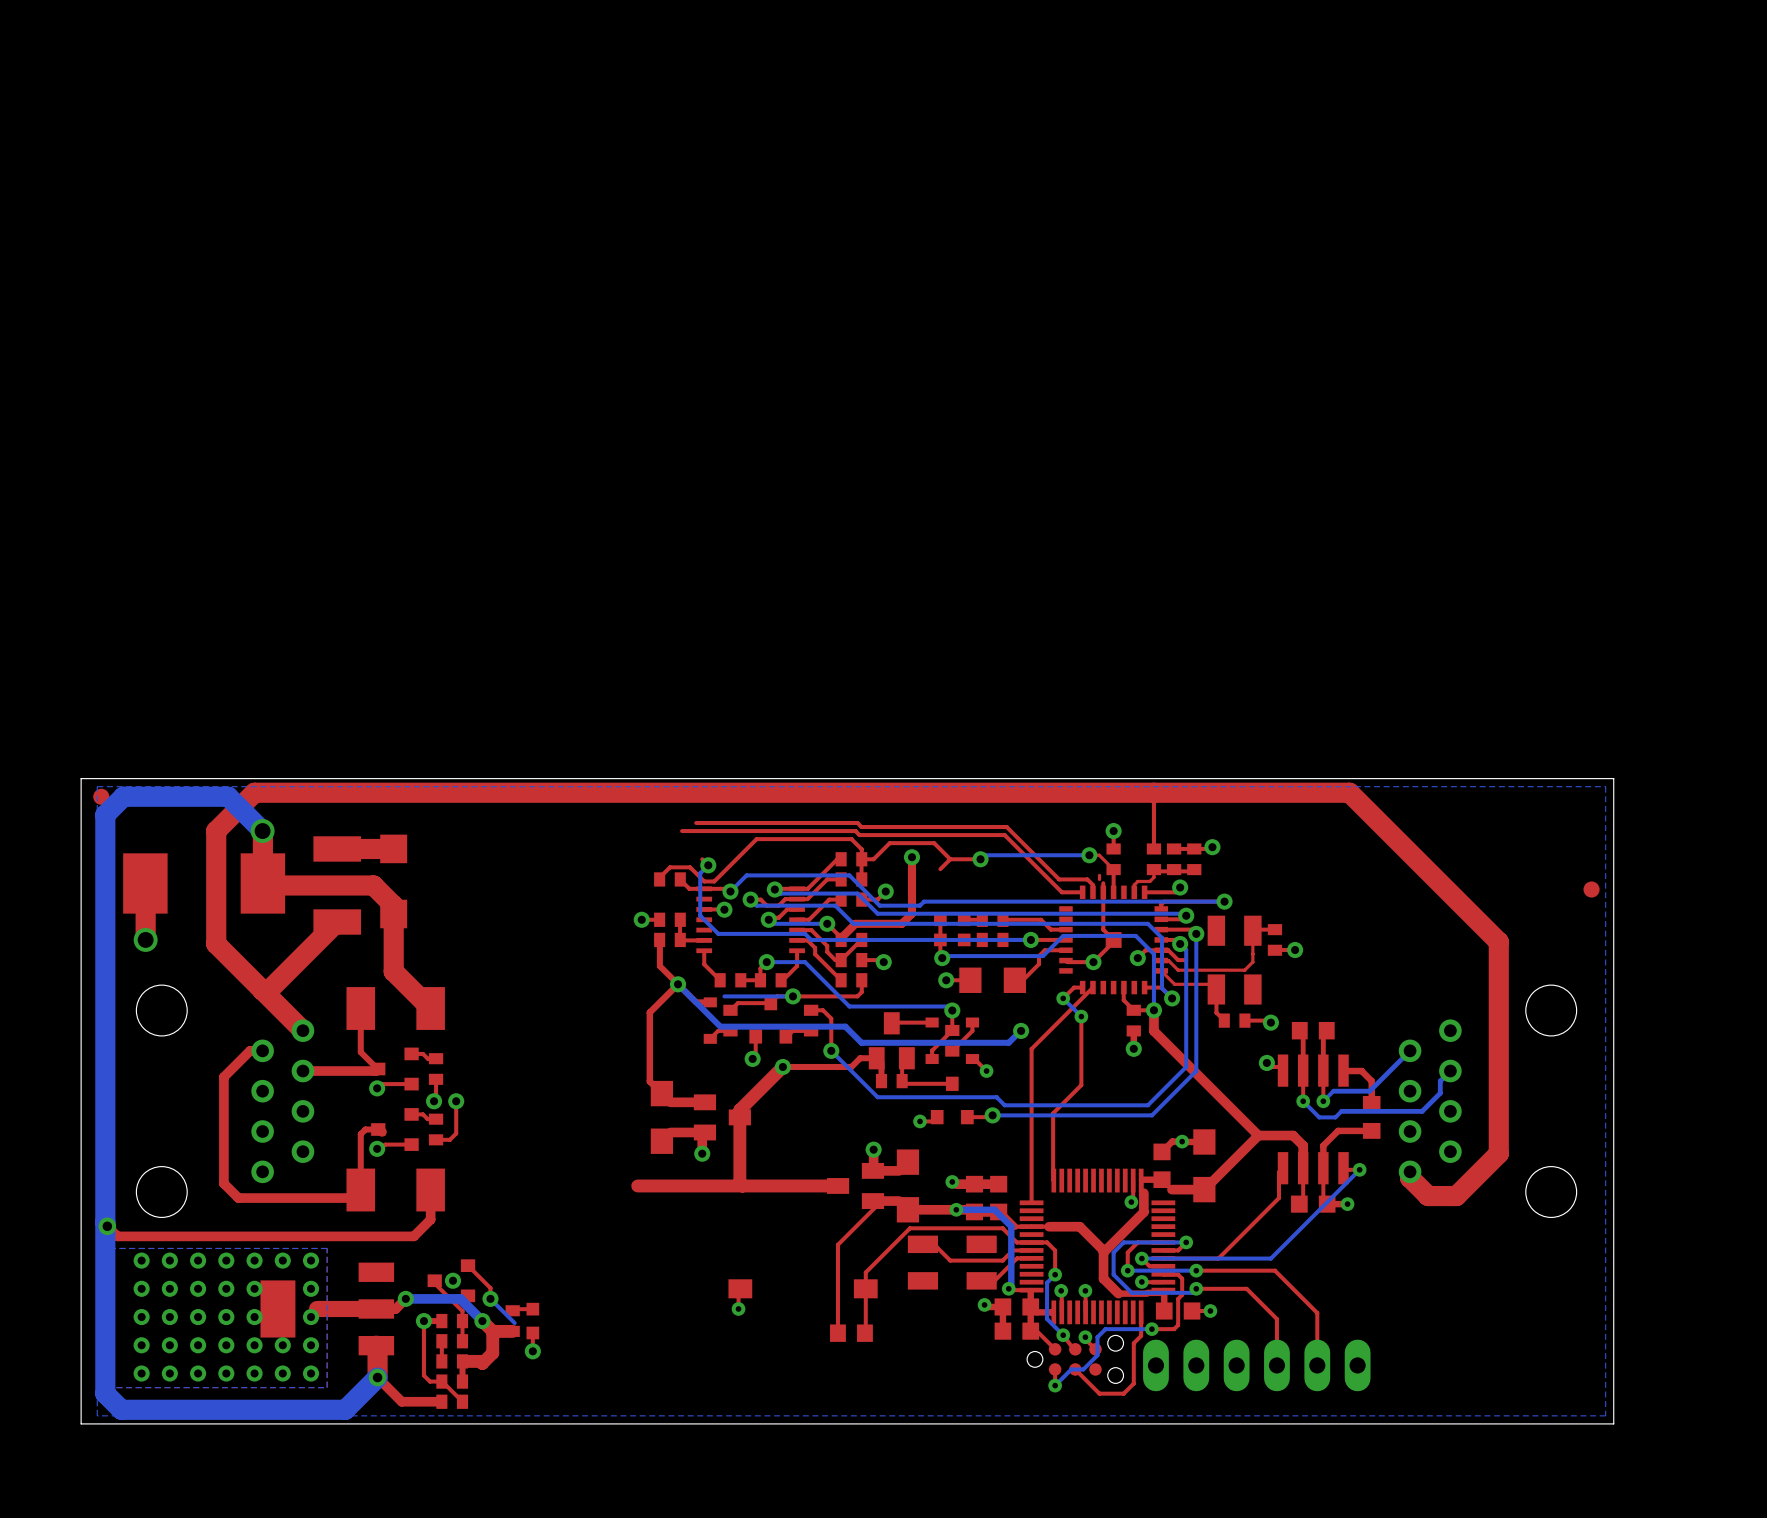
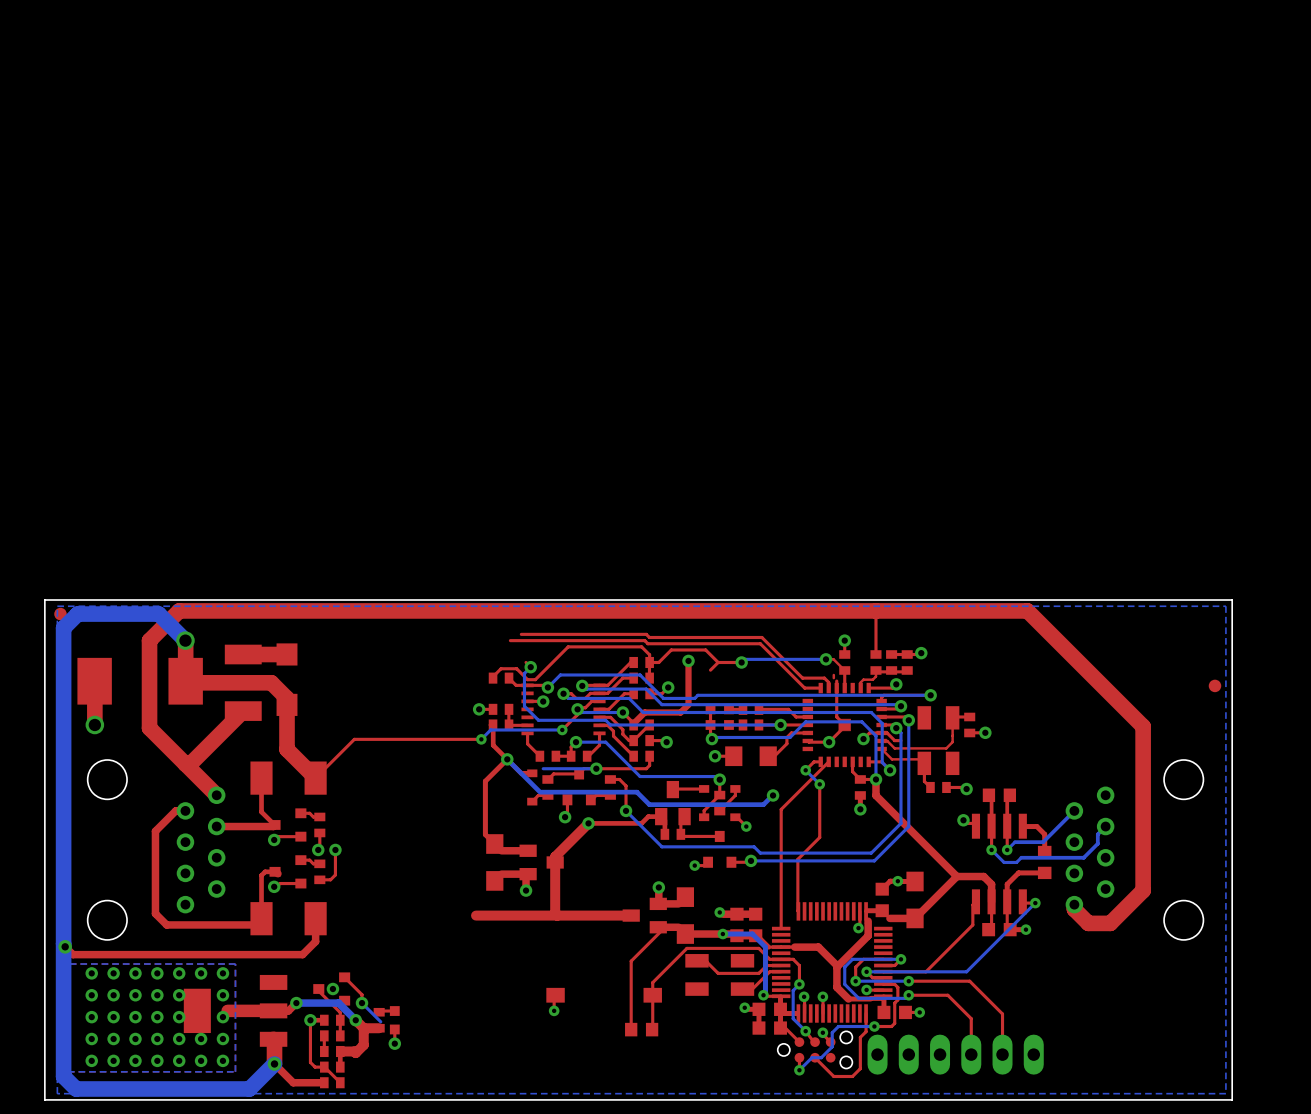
top track: none -> (577, 709) (577, 714) (562, 729)
bottom track: none -> (562, 729) (490, 729) (481, 739)
via: none -> (562, 729)
top track: none -> (481, 739) (354, 739) (315, 778)
via: none -> (481, 739)

